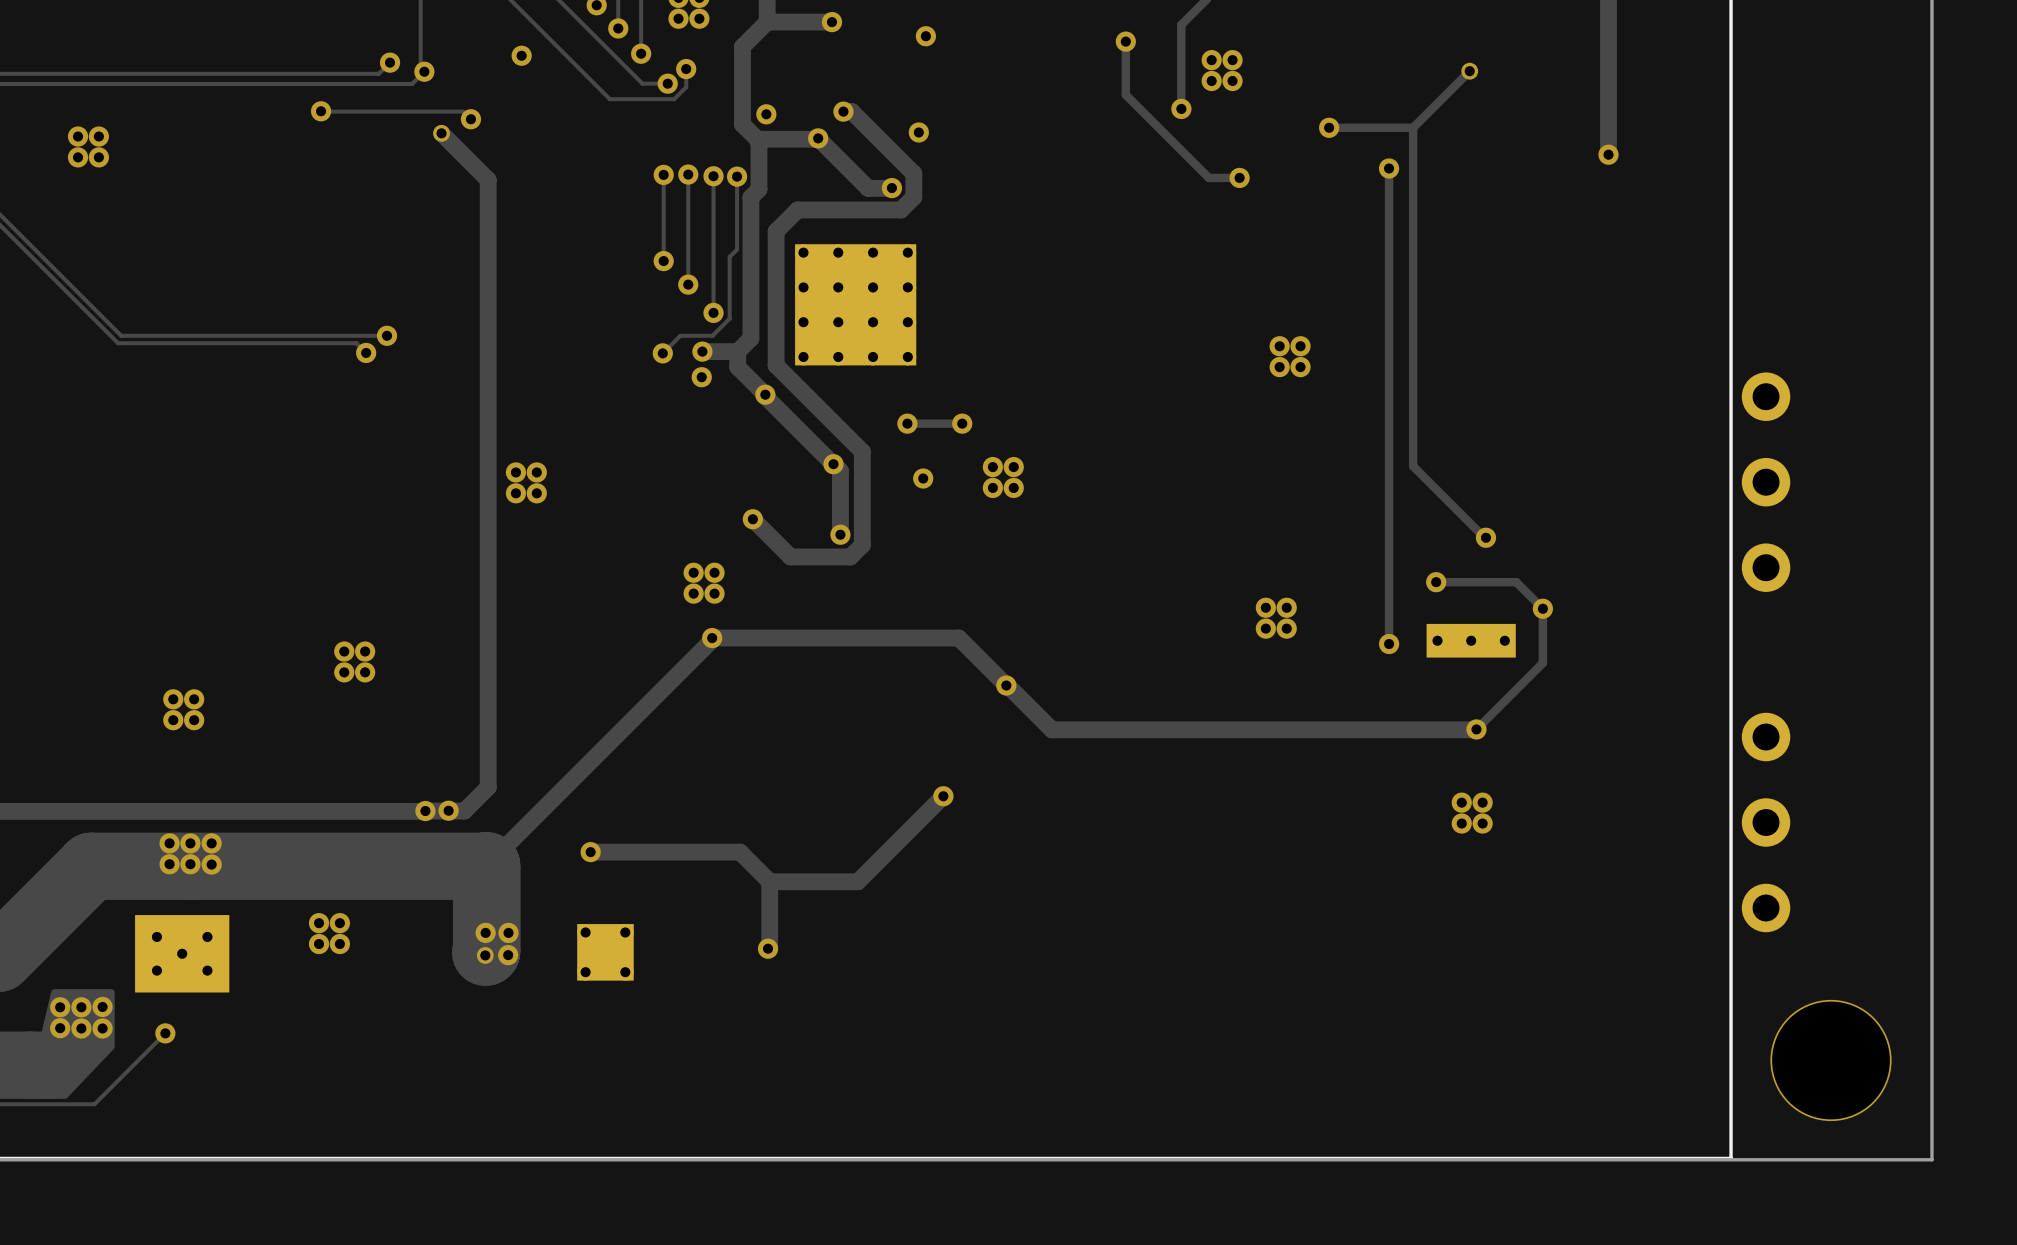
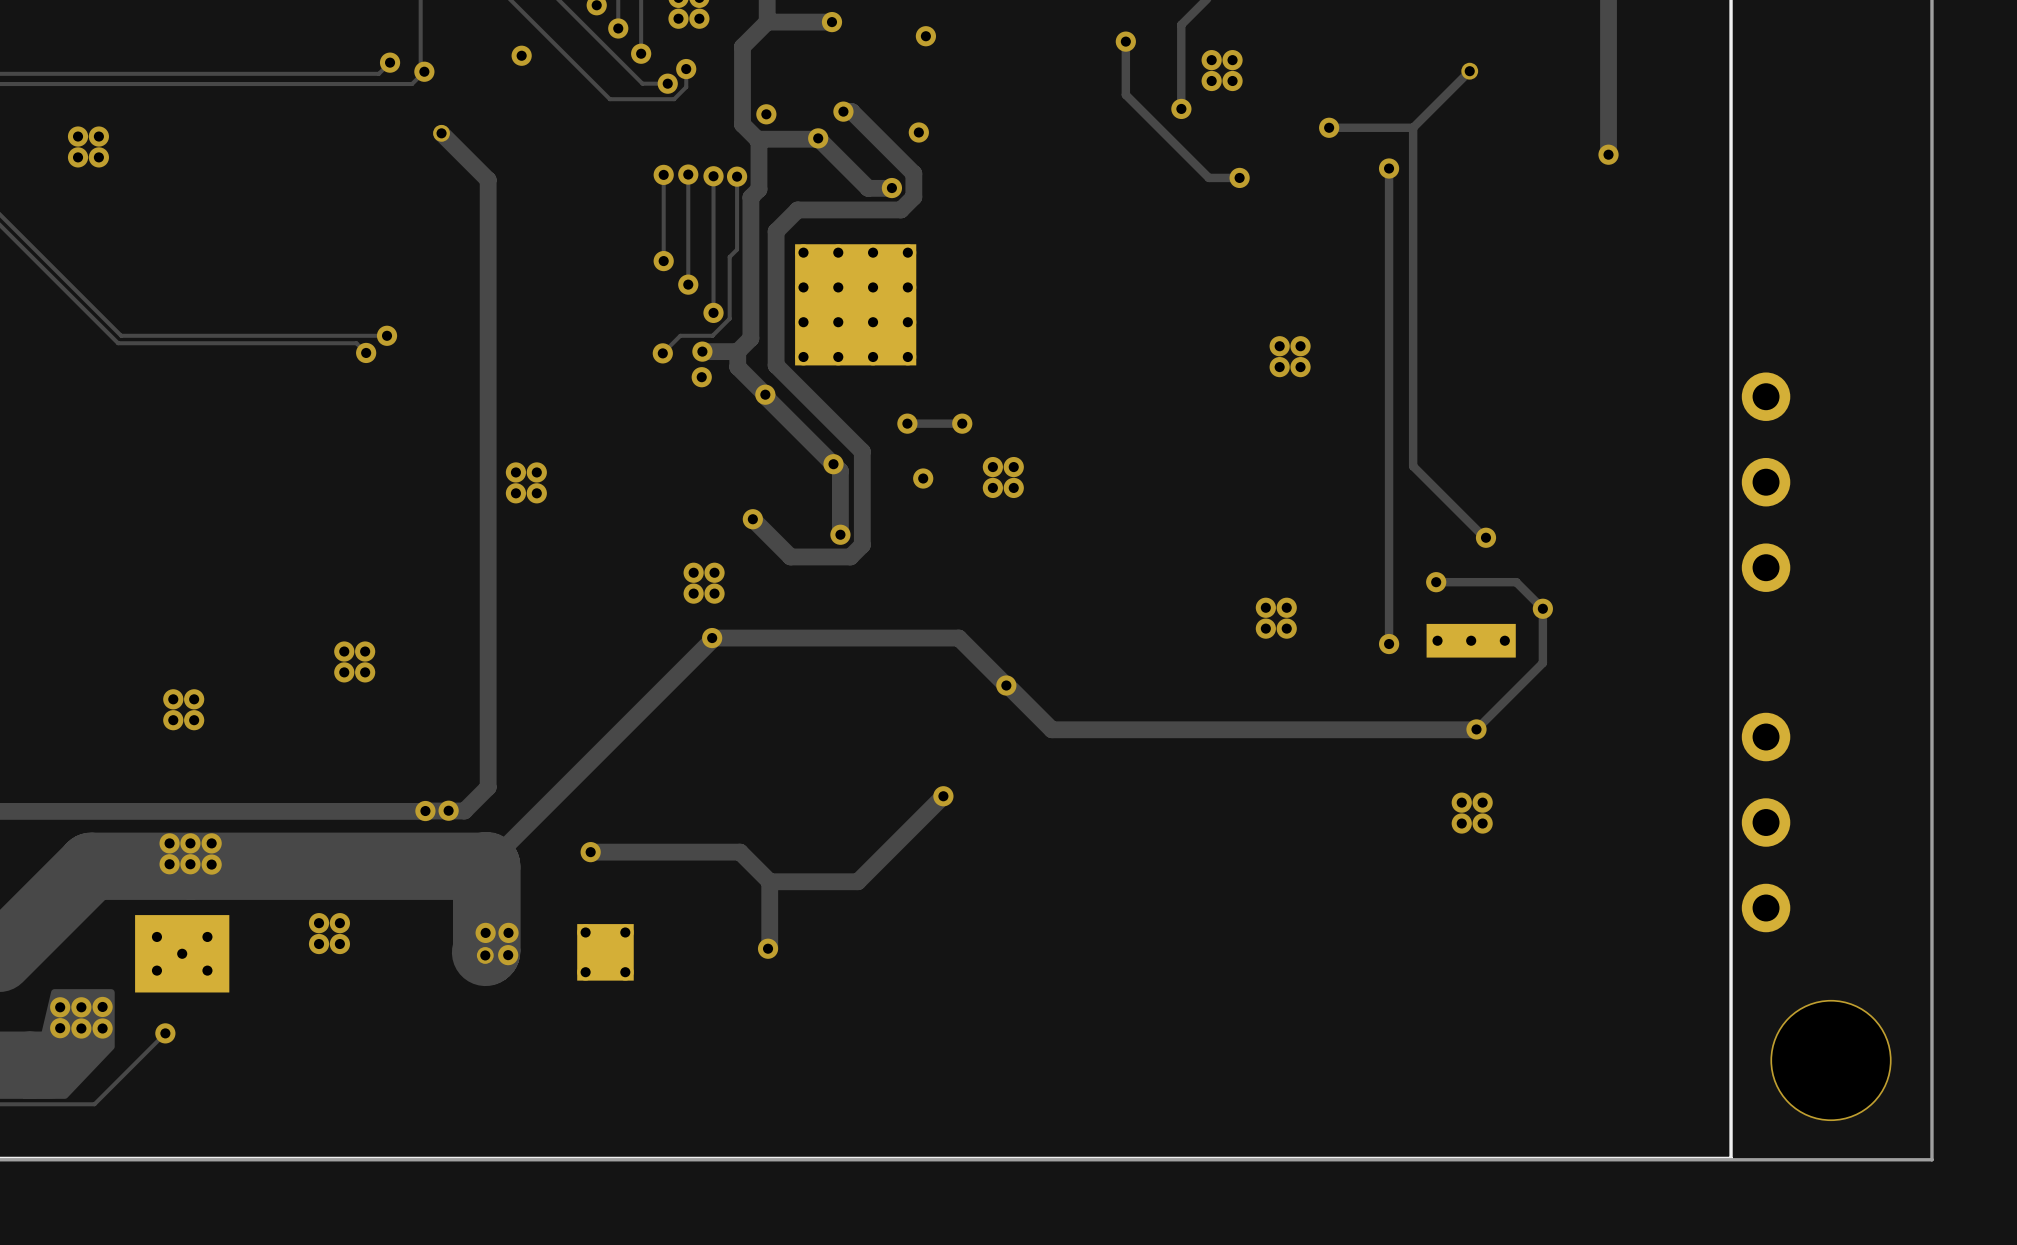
track: (321, 111) (463, 111) (470, 119) -> none
via: (321, 111) -> none
via: (470, 119) -> none

